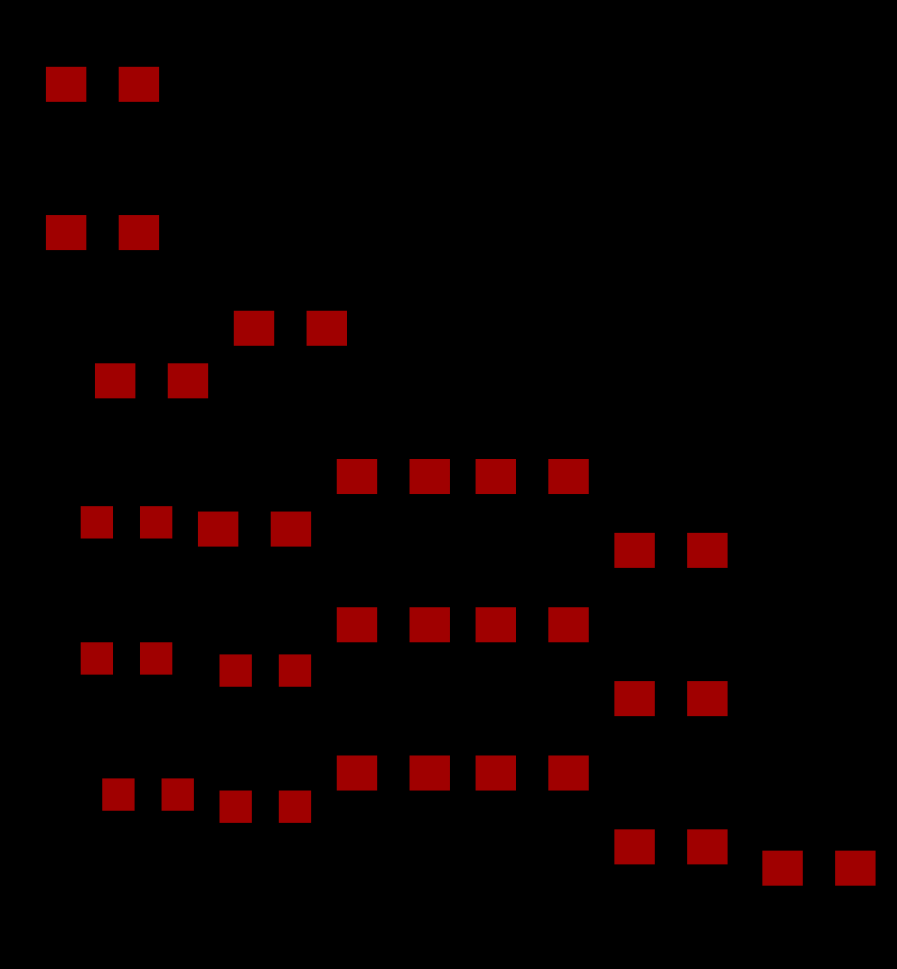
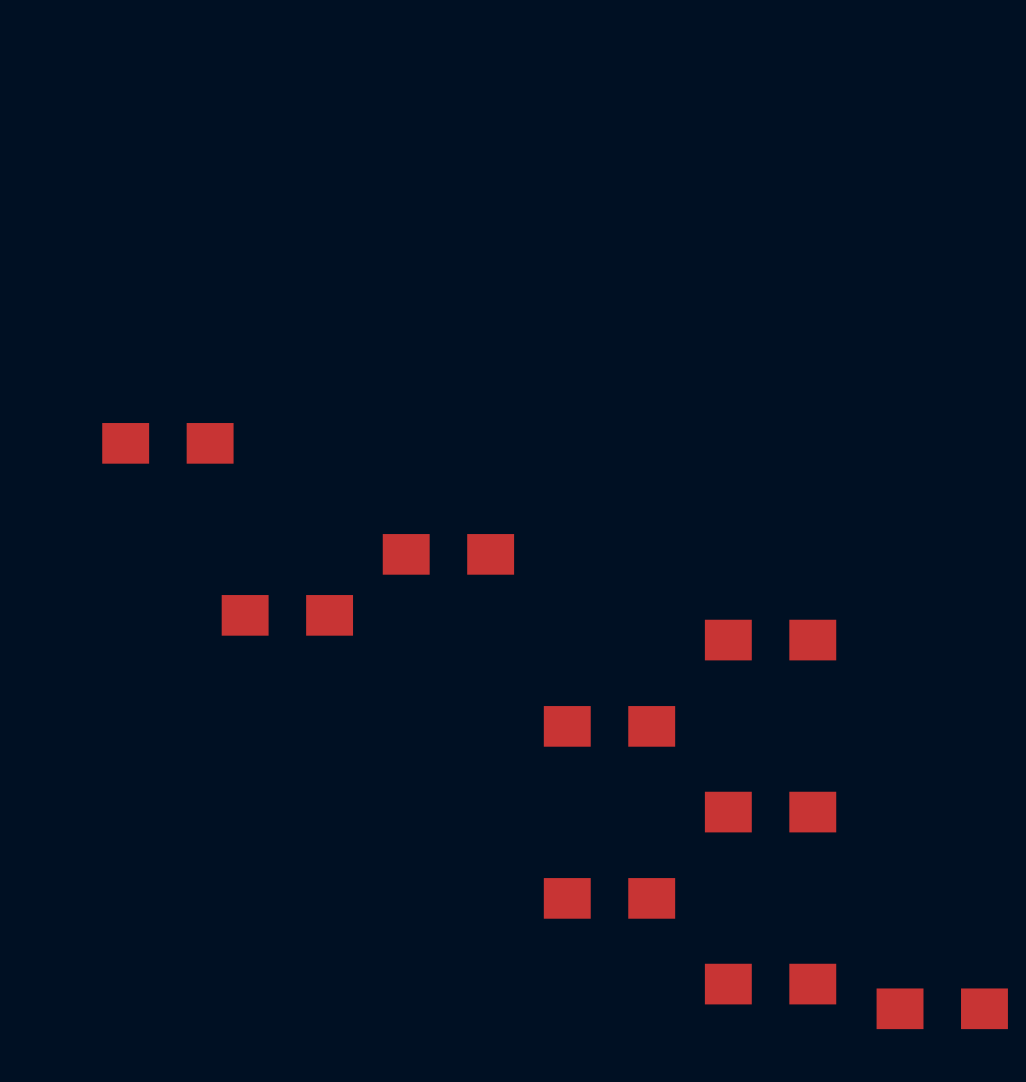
part: (102, 84) -> none
part: (102, 232) -> none
part: (290, 328) -> none
part: (532, 476) -> none
part: (126, 522) -> none
part: (393, 624) -> none
part: (126, 658) -> none
part: (265, 670) -> none
part: (393, 773) -> none
part: (148, 794) -> none
part: (265, 806) -> none

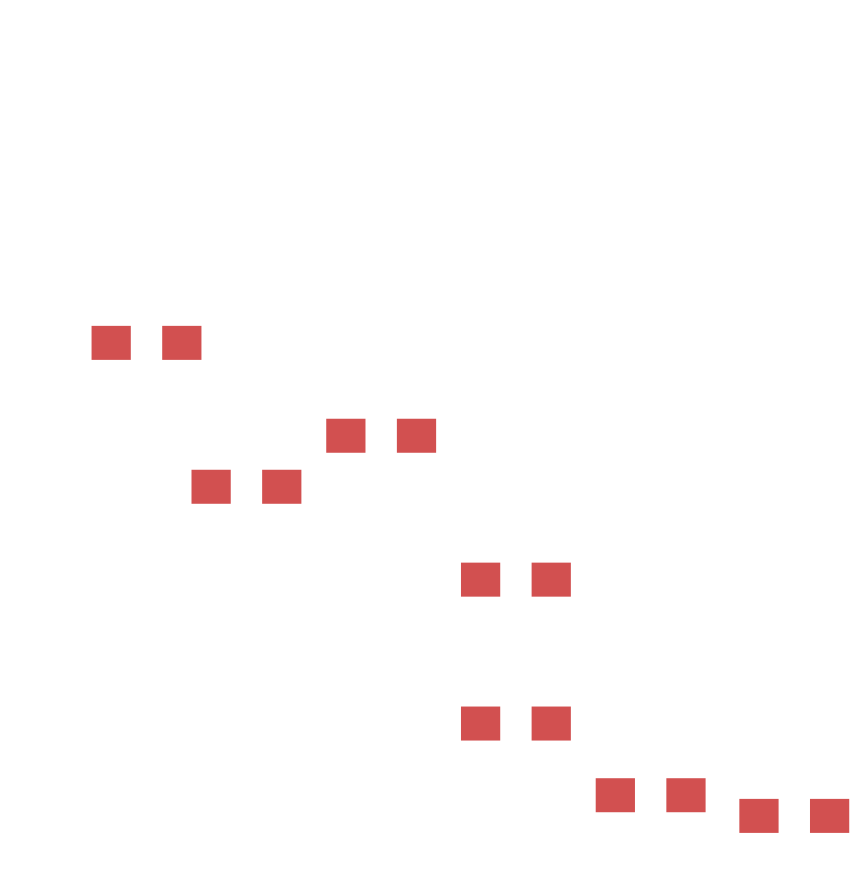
part: (770, 640) -> none
part: (770, 812) -> none

